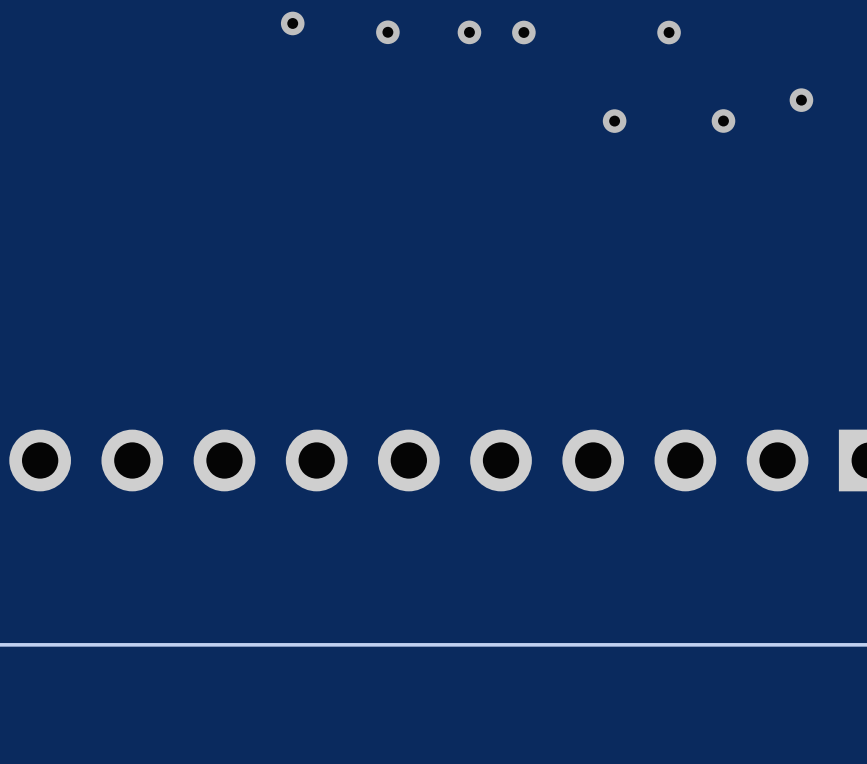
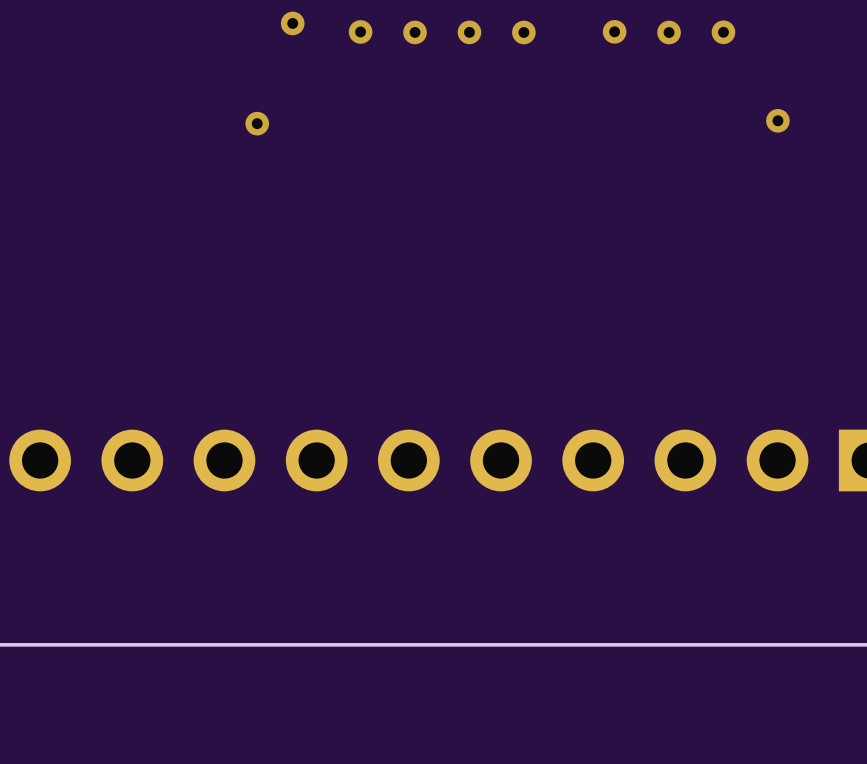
via: none -> (360, 31)
via: none -> (614, 31)
via: (387, 32) -> none
via: none -> (415, 32)
via: none -> (723, 32)
via position: (801, 100) -> (777, 120)
via: (614, 121) -> none
via: (723, 121) -> none
via: none -> (257, 123)

